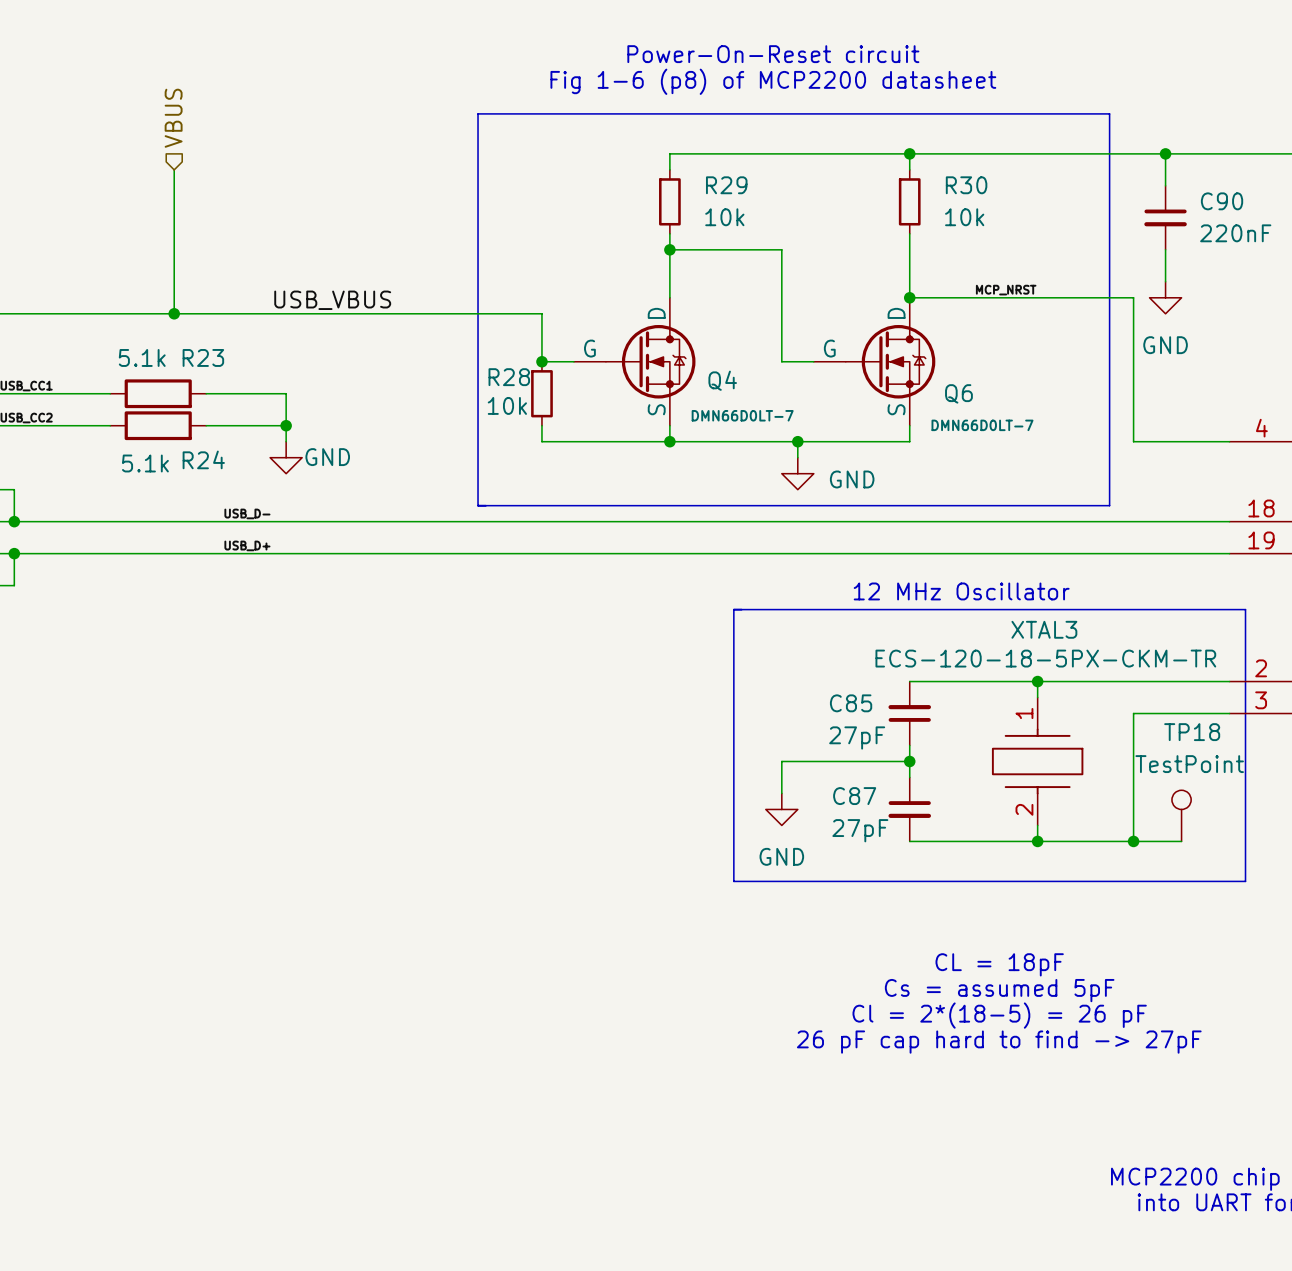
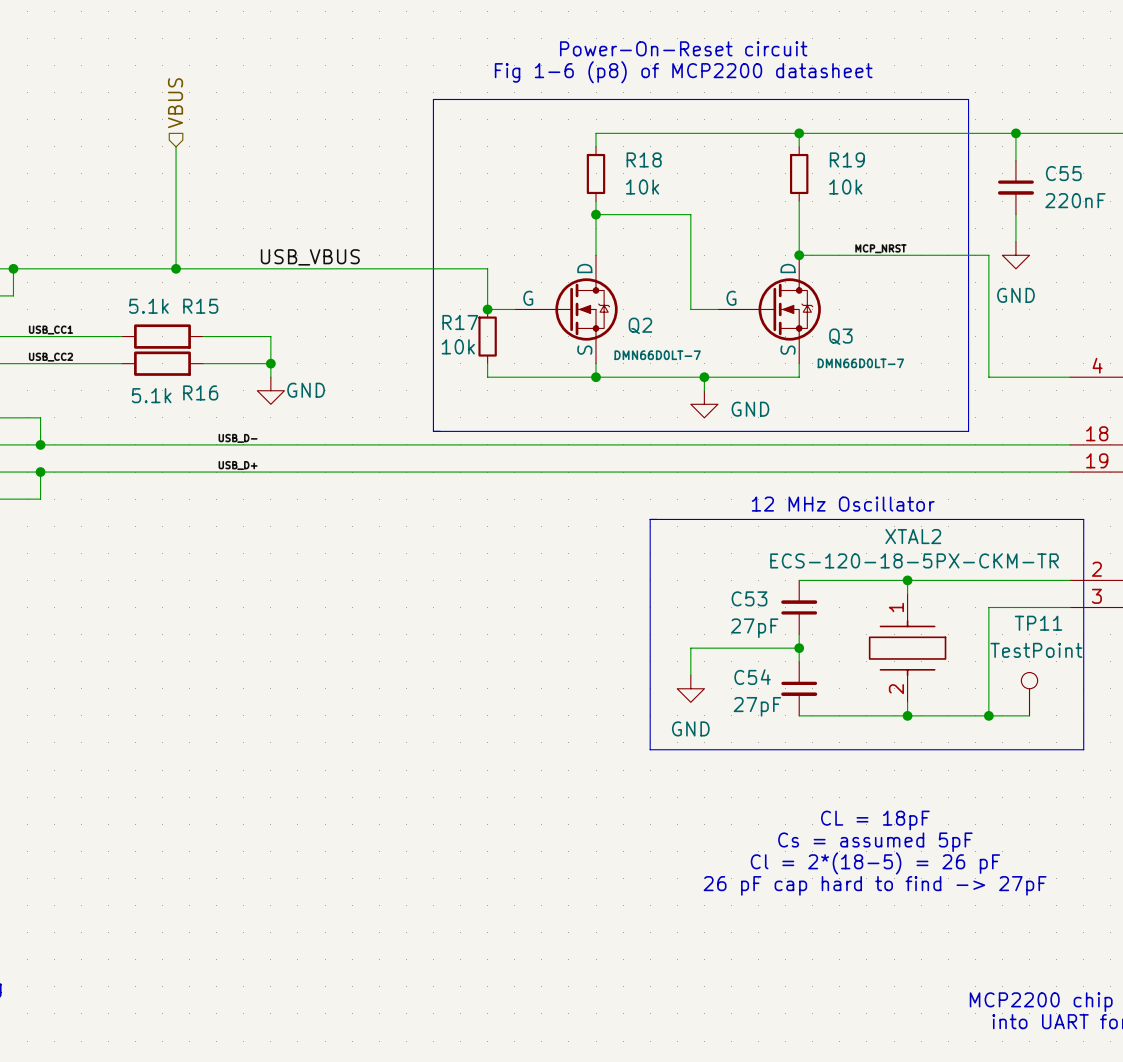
R29 name: R29 (726, 185) -> R18 (644, 159)
R30 name: R30 (966, 185) -> R19 (847, 159)
C90 name: C90 (1222, 201) -> C55 (1063, 173)
R23 name: R23 (203, 357) -> R15 (200, 306)
R28 name: R28 (509, 377) -> R17 (460, 322)
Q4 name: Q4 (722, 380) -> Q2 (640, 325)
Q6 name: Q6 (958, 393) -> Q3 (840, 336)
R24 name: R24 (203, 459) -> R16 (200, 392)
XTAL3 name: XTAL3 (1044, 629) -> XTAL2 (913, 536)
C85 name: C85 (851, 703) -> C53 (749, 598)
TP18 name: TP18 (1192, 732) -> TP11 (1038, 623)
C87 name: C87 (854, 796) -> C54 (752, 677)

